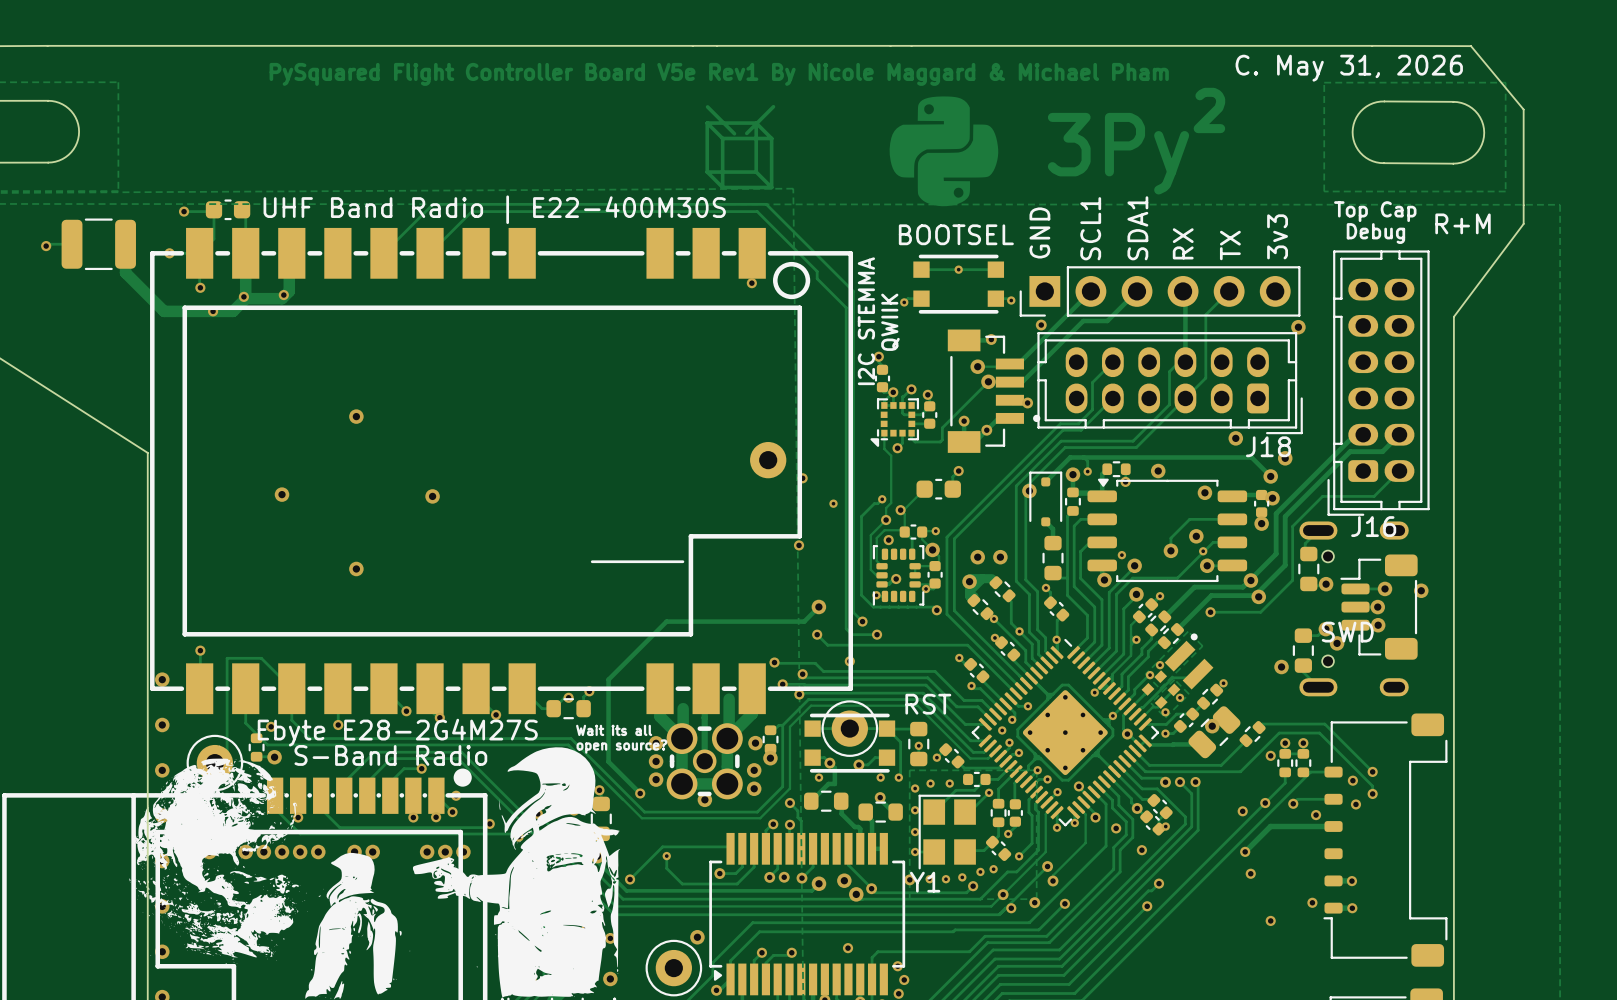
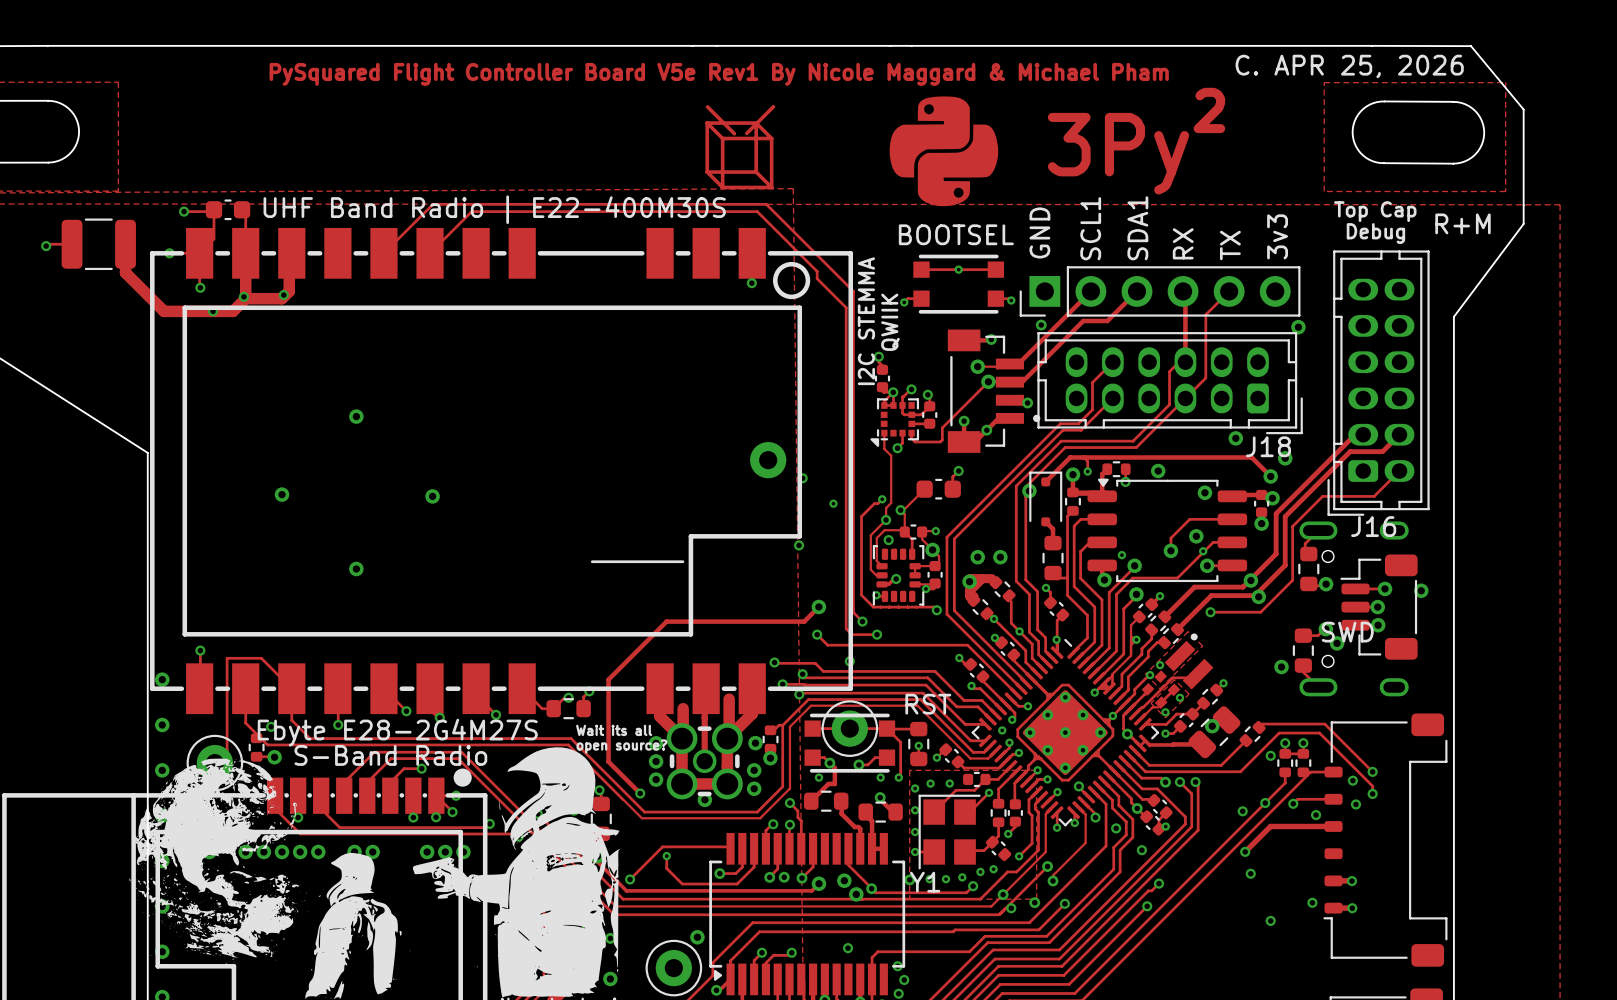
text: C. May 31, 2026 (1349, 68) -> C. APR 25, 2026 (1349, 66)

